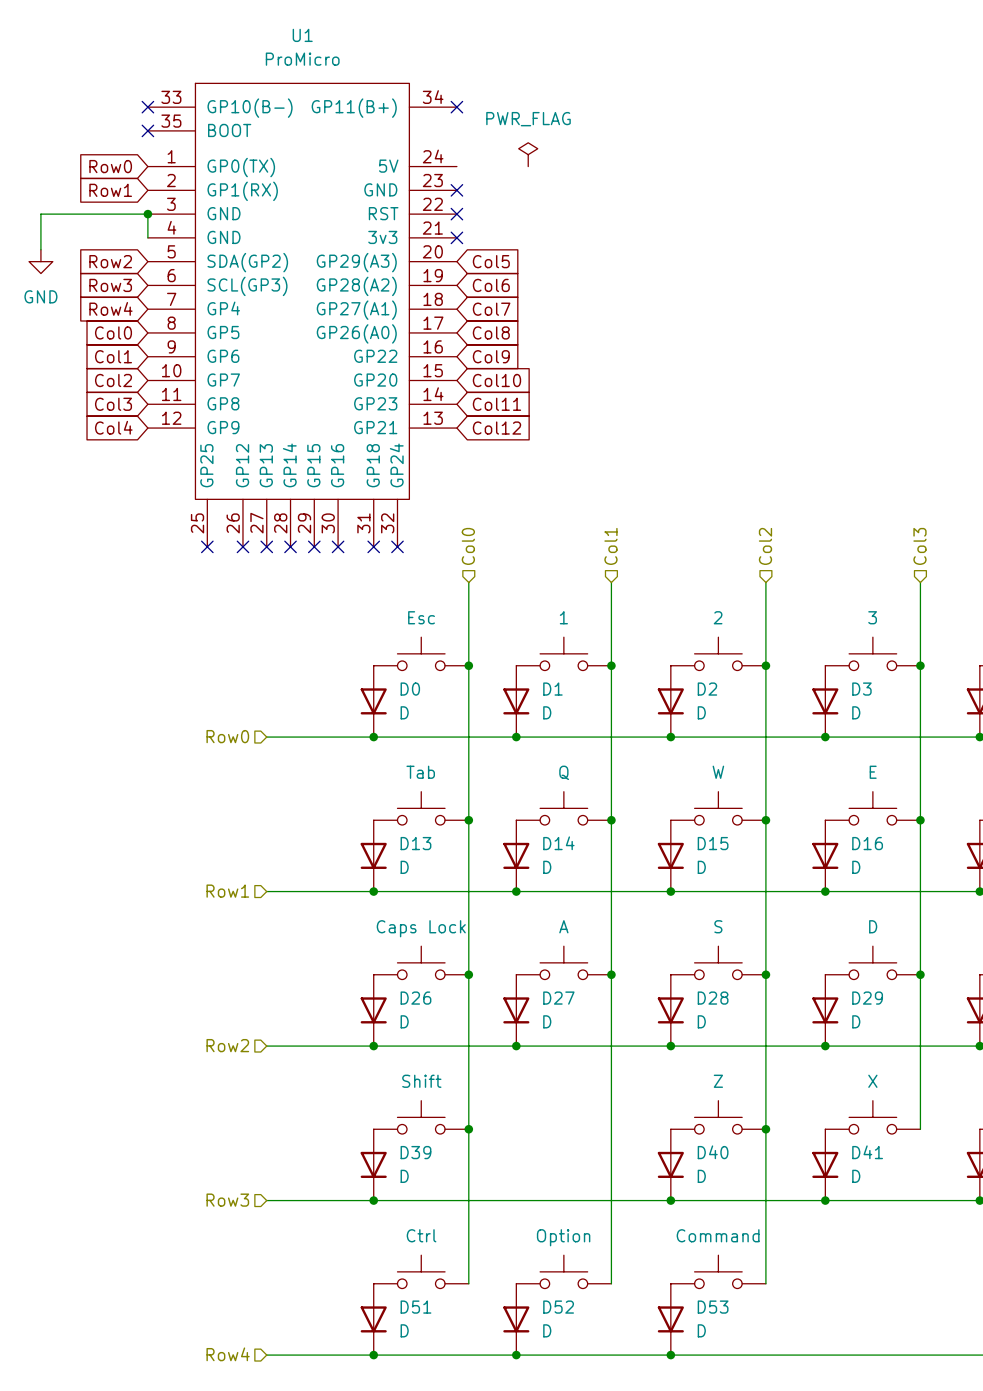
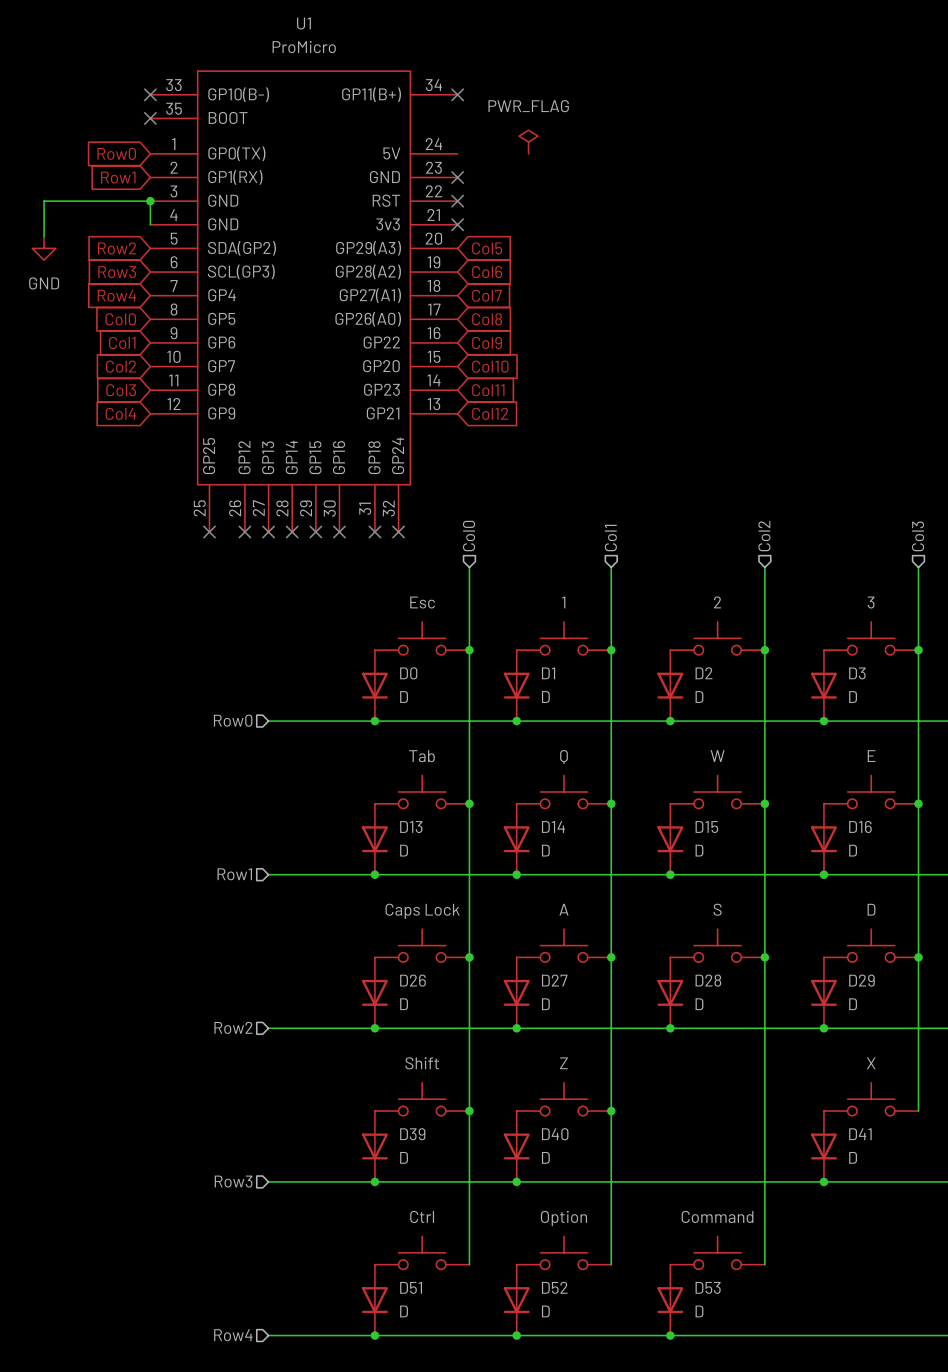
part position: (718, 1117) -> (563, 1099)
junction: none -> (611, 1111)
junction: (765, 1129) -> none
D40 position: (670, 1164) -> (516, 1146)
junction: none -> (516, 1181)
junction: (670, 1200) -> none

